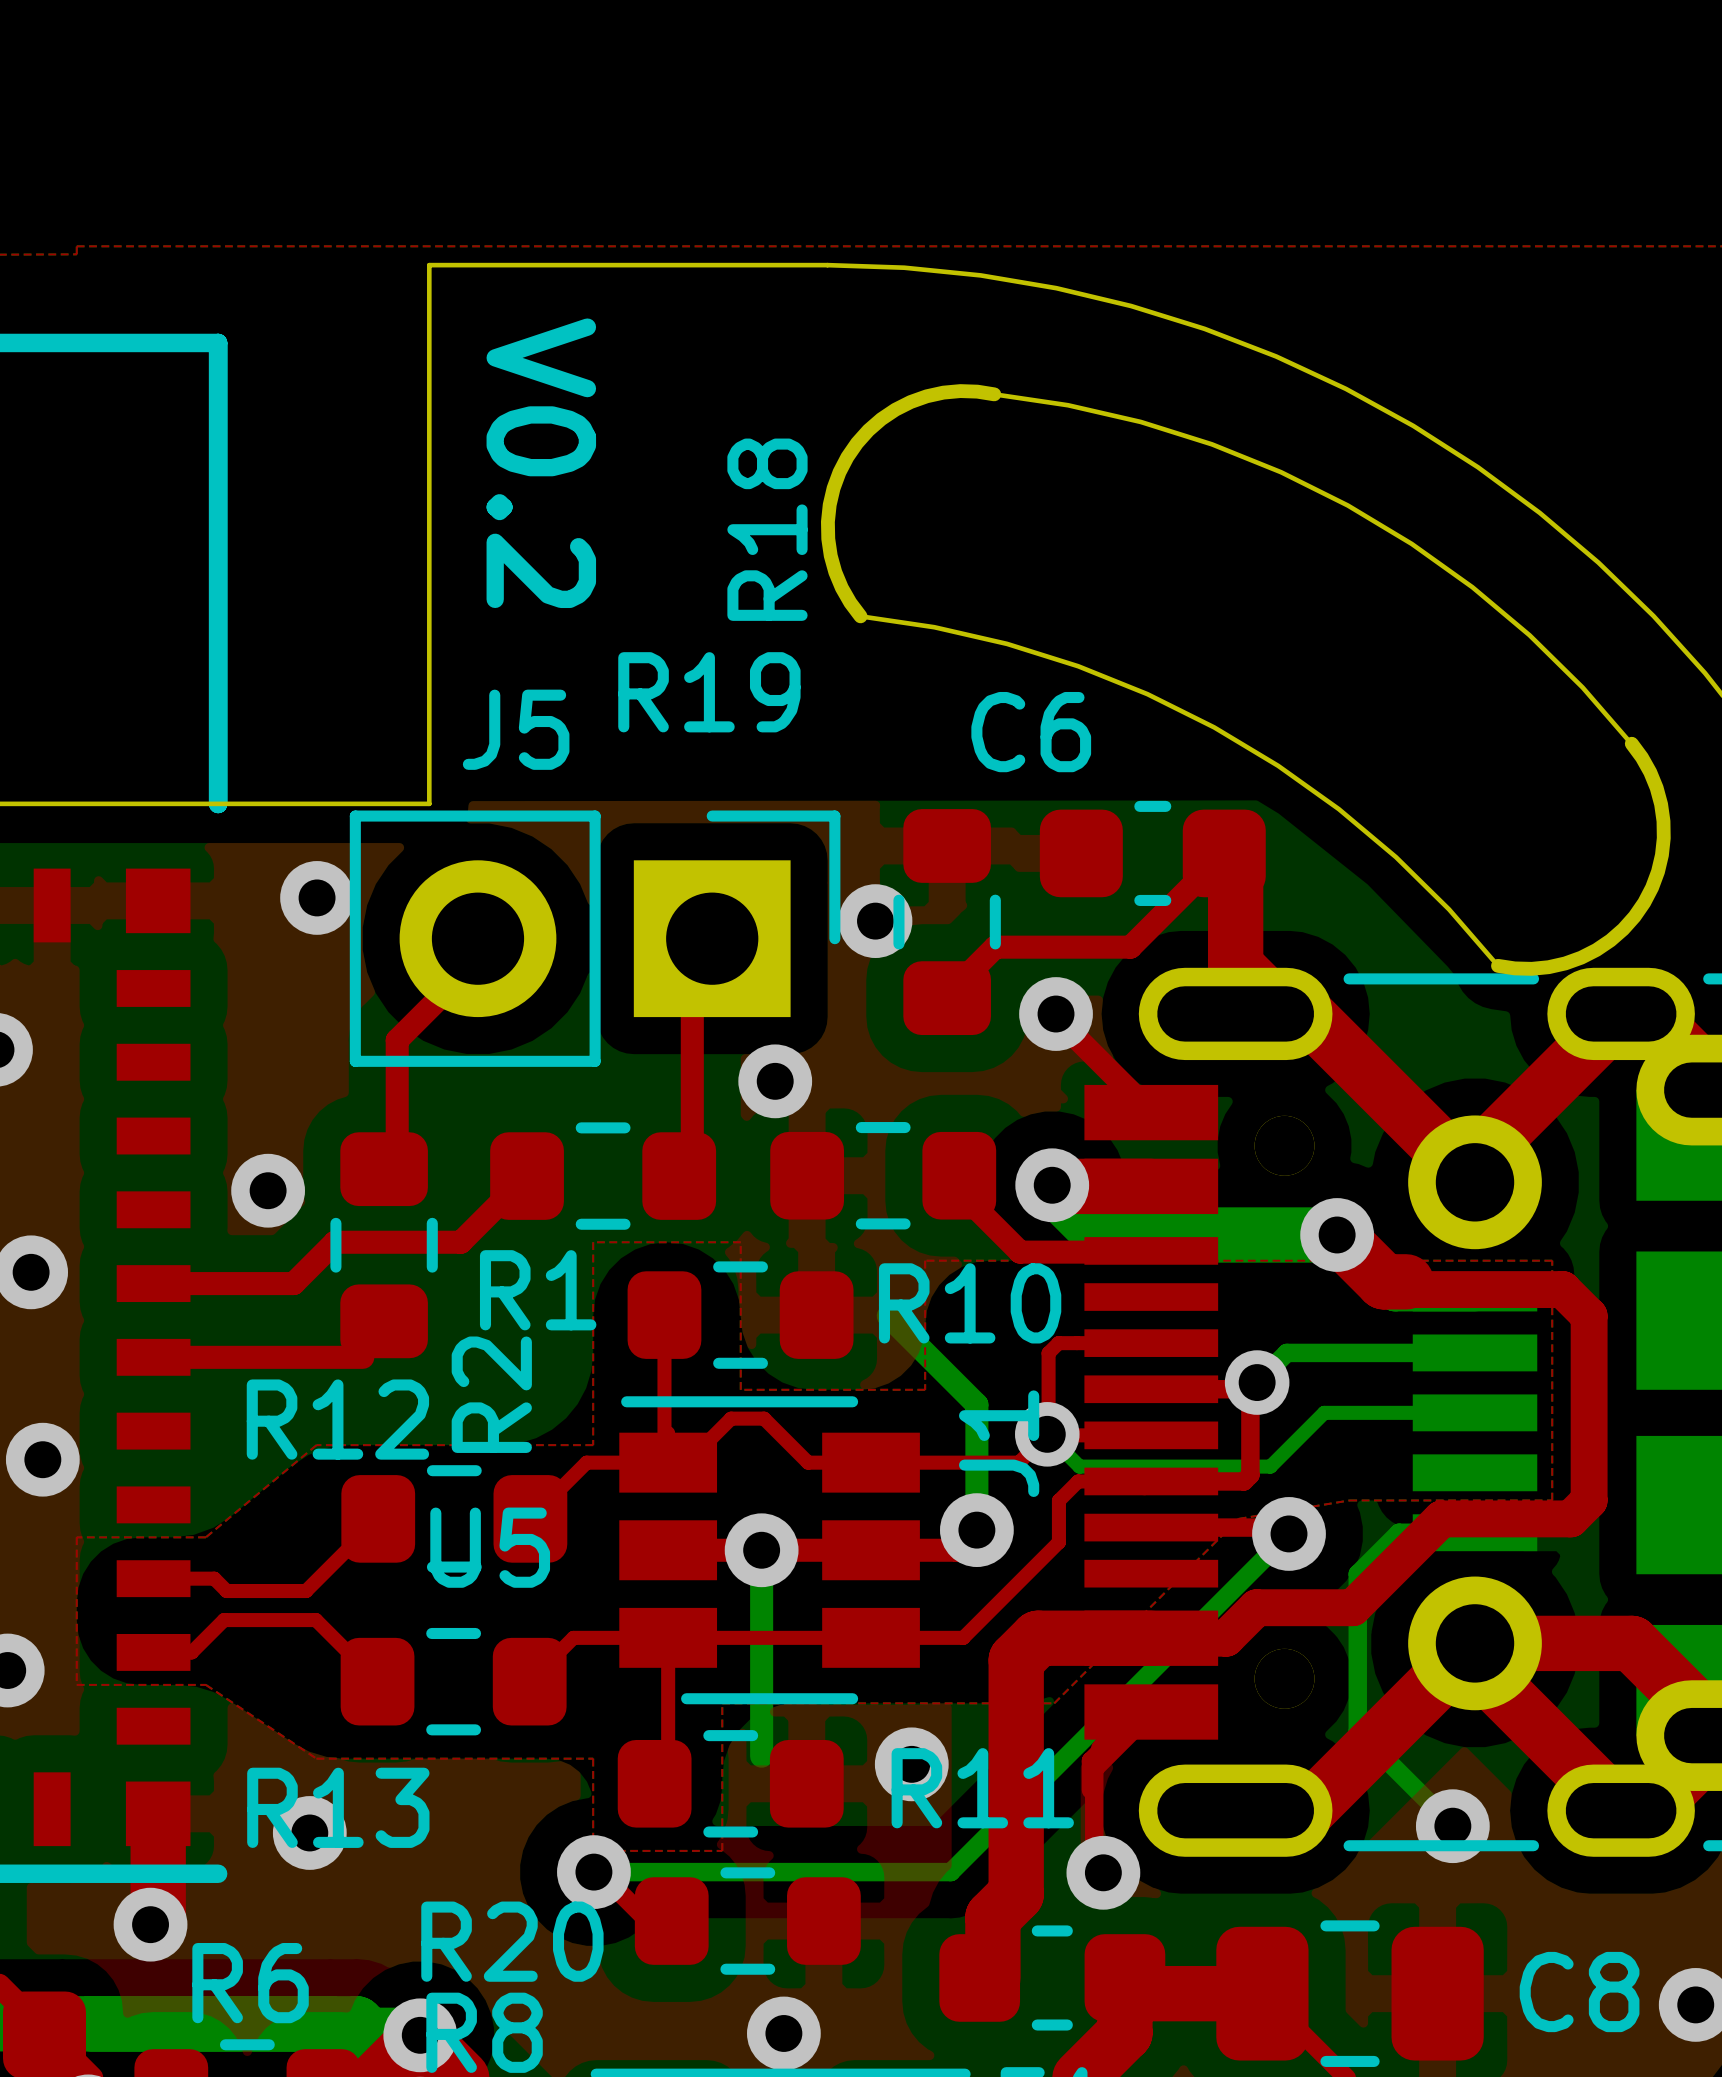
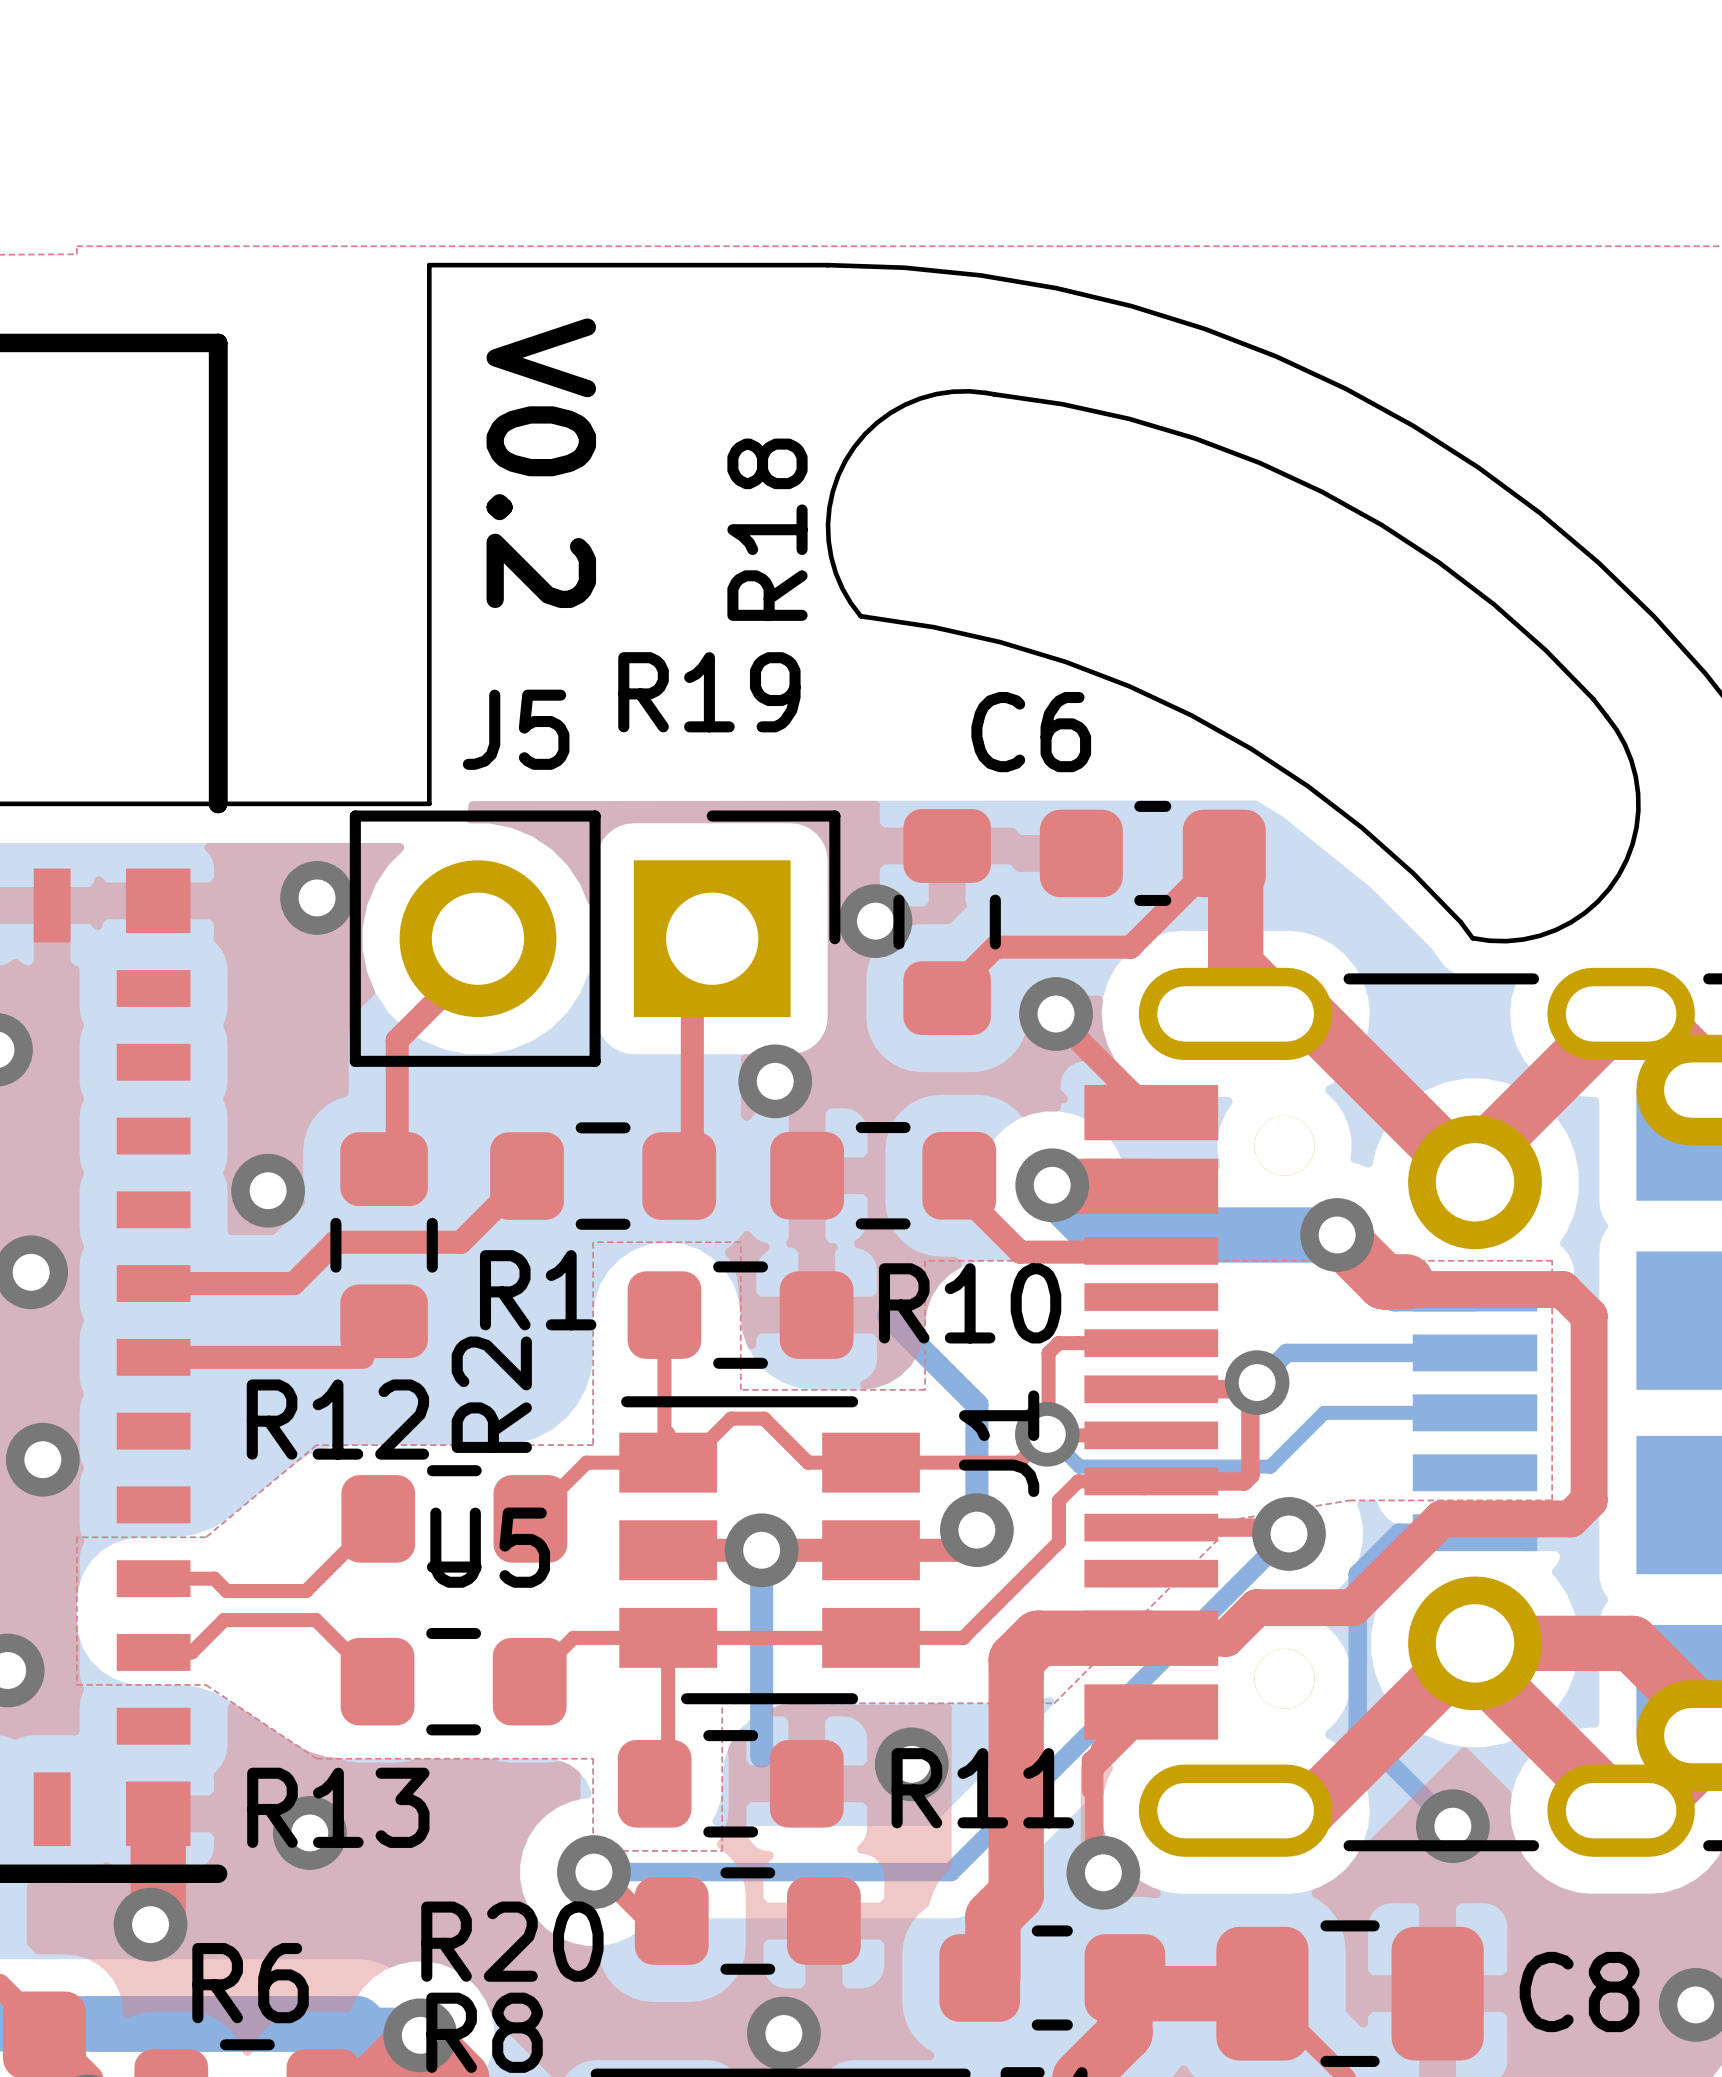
board edge: (1631, 743) (1650, 772) (1656, 787) (1663, 821) (1661, 855) (1658, 871) (1644, 902) (1623, 929) (1596, 949) (1581, 957) (1548, 967) (1514, 968) (1497, 965) (1449, 909) (1395, 857) (1338, 809) (1278, 765) (1214, 727) (1147, 694) (1078, 666) (1007, 643) (934, 627) (860, 616) (841, 587) (830, 555) (827, 521) (833, 488) (839, 472) (857, 443) (881, 419) (910, 402) (943, 392) (977, 391) (1068, 405) (1140, 421) (1211, 444) (1281, 472) (1347, 505) (1411, 543) (1472, 587) (1529, 635) (1582, 687) (1631, 743) -> (986, 392) (952, 391) (920, 398) (905, 404) (877, 422) (854, 446) (845, 460) (832, 491) (828, 524) (828, 540) (831, 557) (842, 588) (860, 616) (933, 627) (1000, 642) (1065, 661) (1129, 686) (1191, 715) (1250, 748) (1308, 786) (1362, 827) (1413, 873) (1460, 922) (1472, 938) (1506, 941) (1539, 935) (1571, 922) (1585, 912) (1609, 888) (1626, 859) (1636, 827) (1638, 793) (1631, 760) (1616, 729) (1593, 699) (1545, 650) (1494, 604) (1439, 562) (1381, 525) (1321, 491) (1259, 462) (1195, 438) (1129, 418) (1062, 404) (986, 392)

